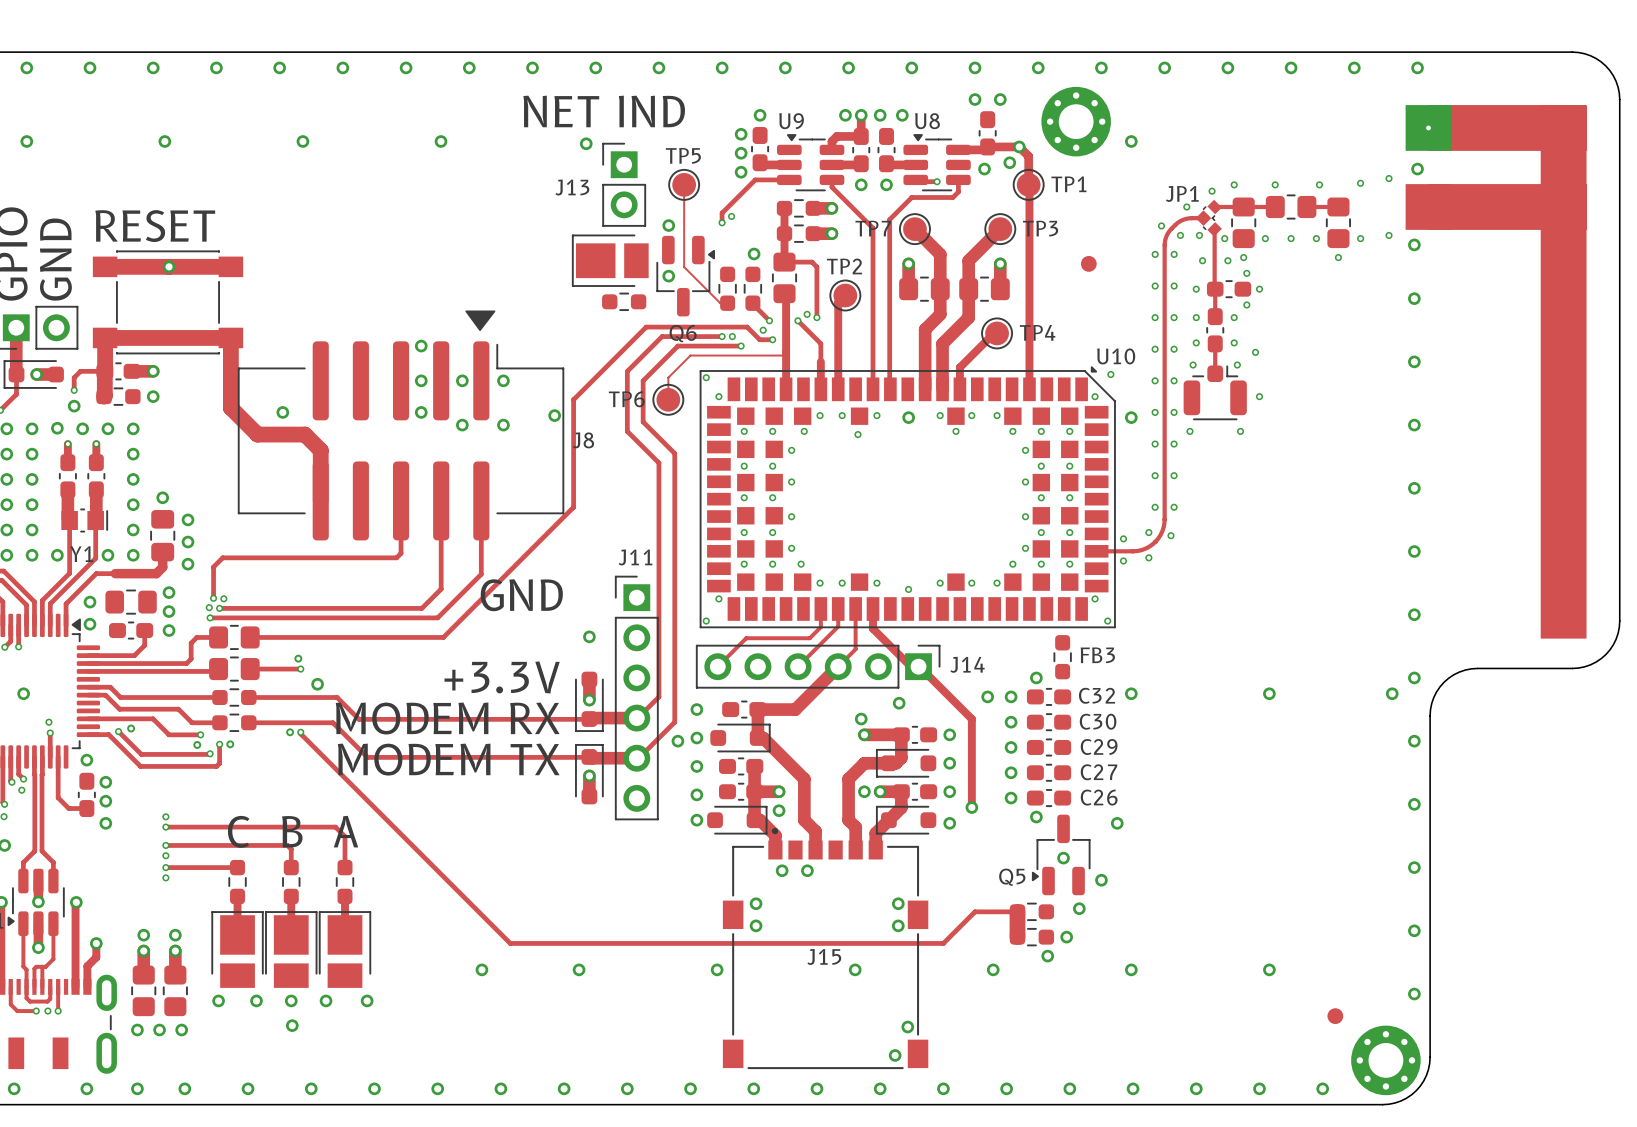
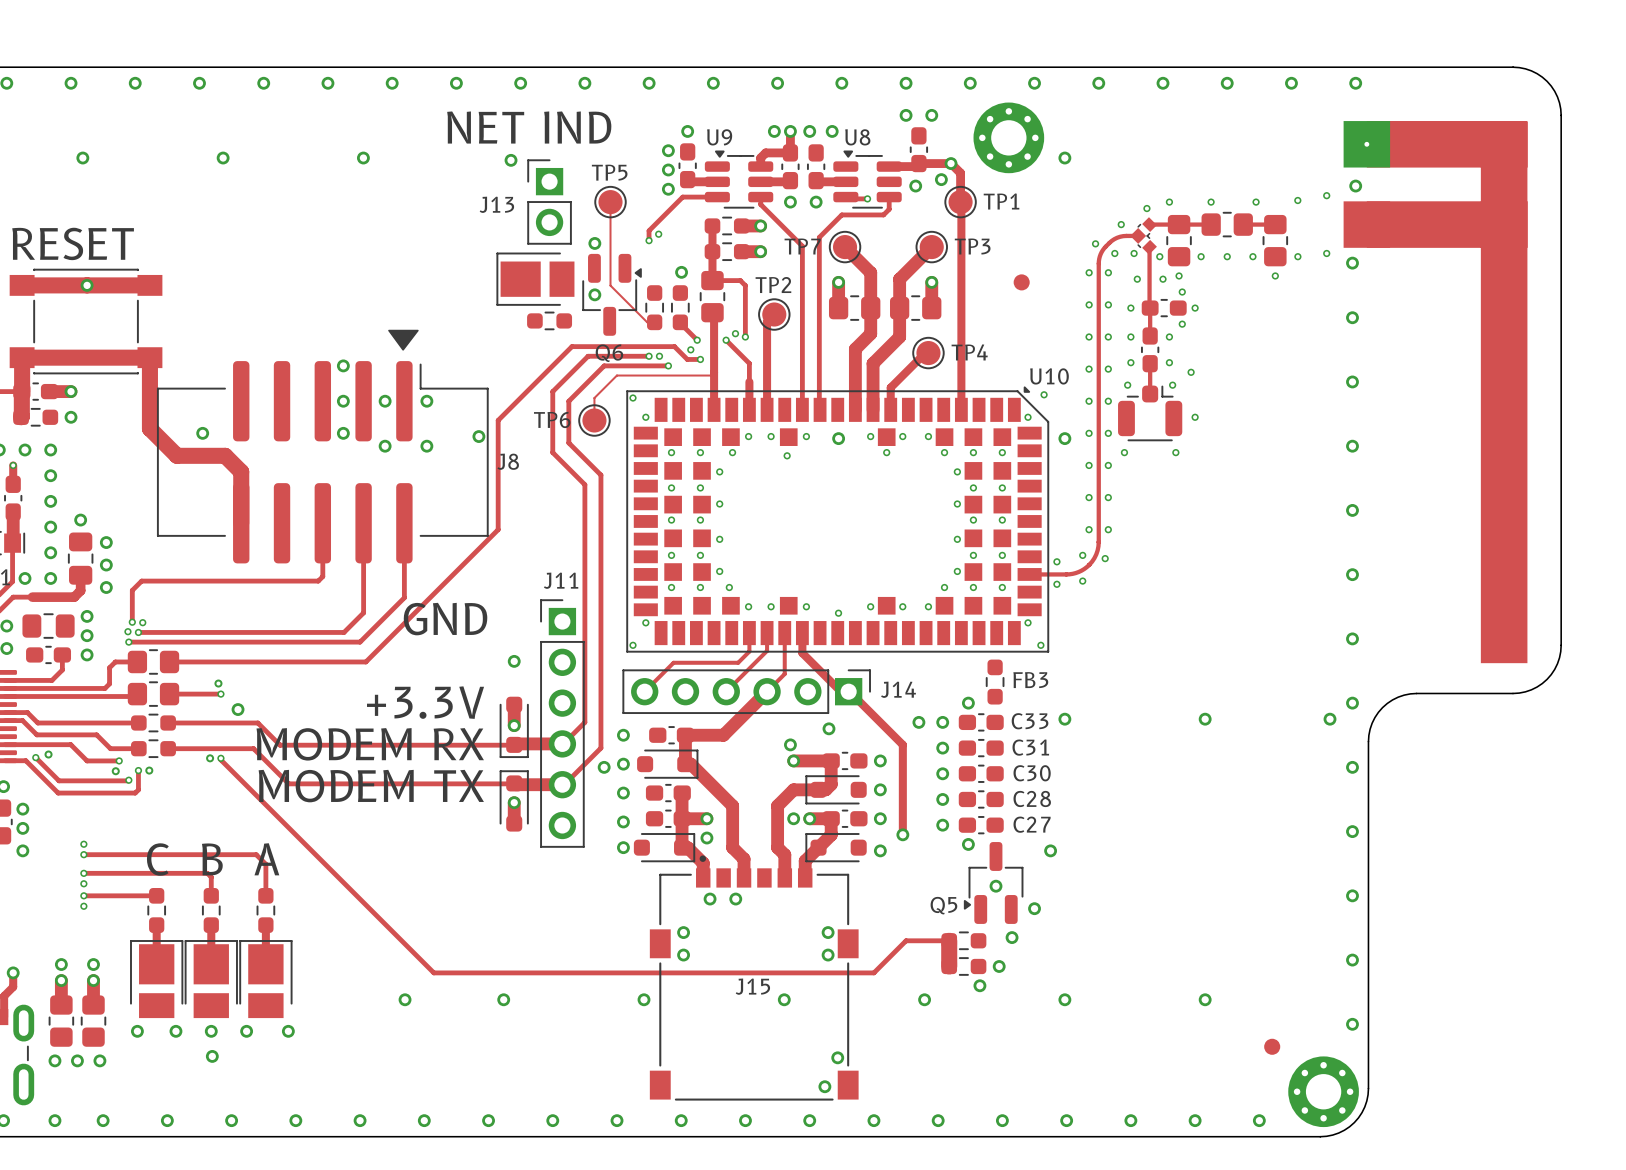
JP1 name: JP1 (1182, 193) -> none
C32 name: C32 (1097, 695) -> C33 (1030, 721)
C30 name: C30 (1098, 721) -> C31 (1030, 747)
C29 name: C29 (1099, 746) -> C30 (1032, 773)
C27 name: C27 (1099, 772) -> C28 (1032, 798)
C26 name: C26 (1099, 797) -> C27 (1032, 824)

